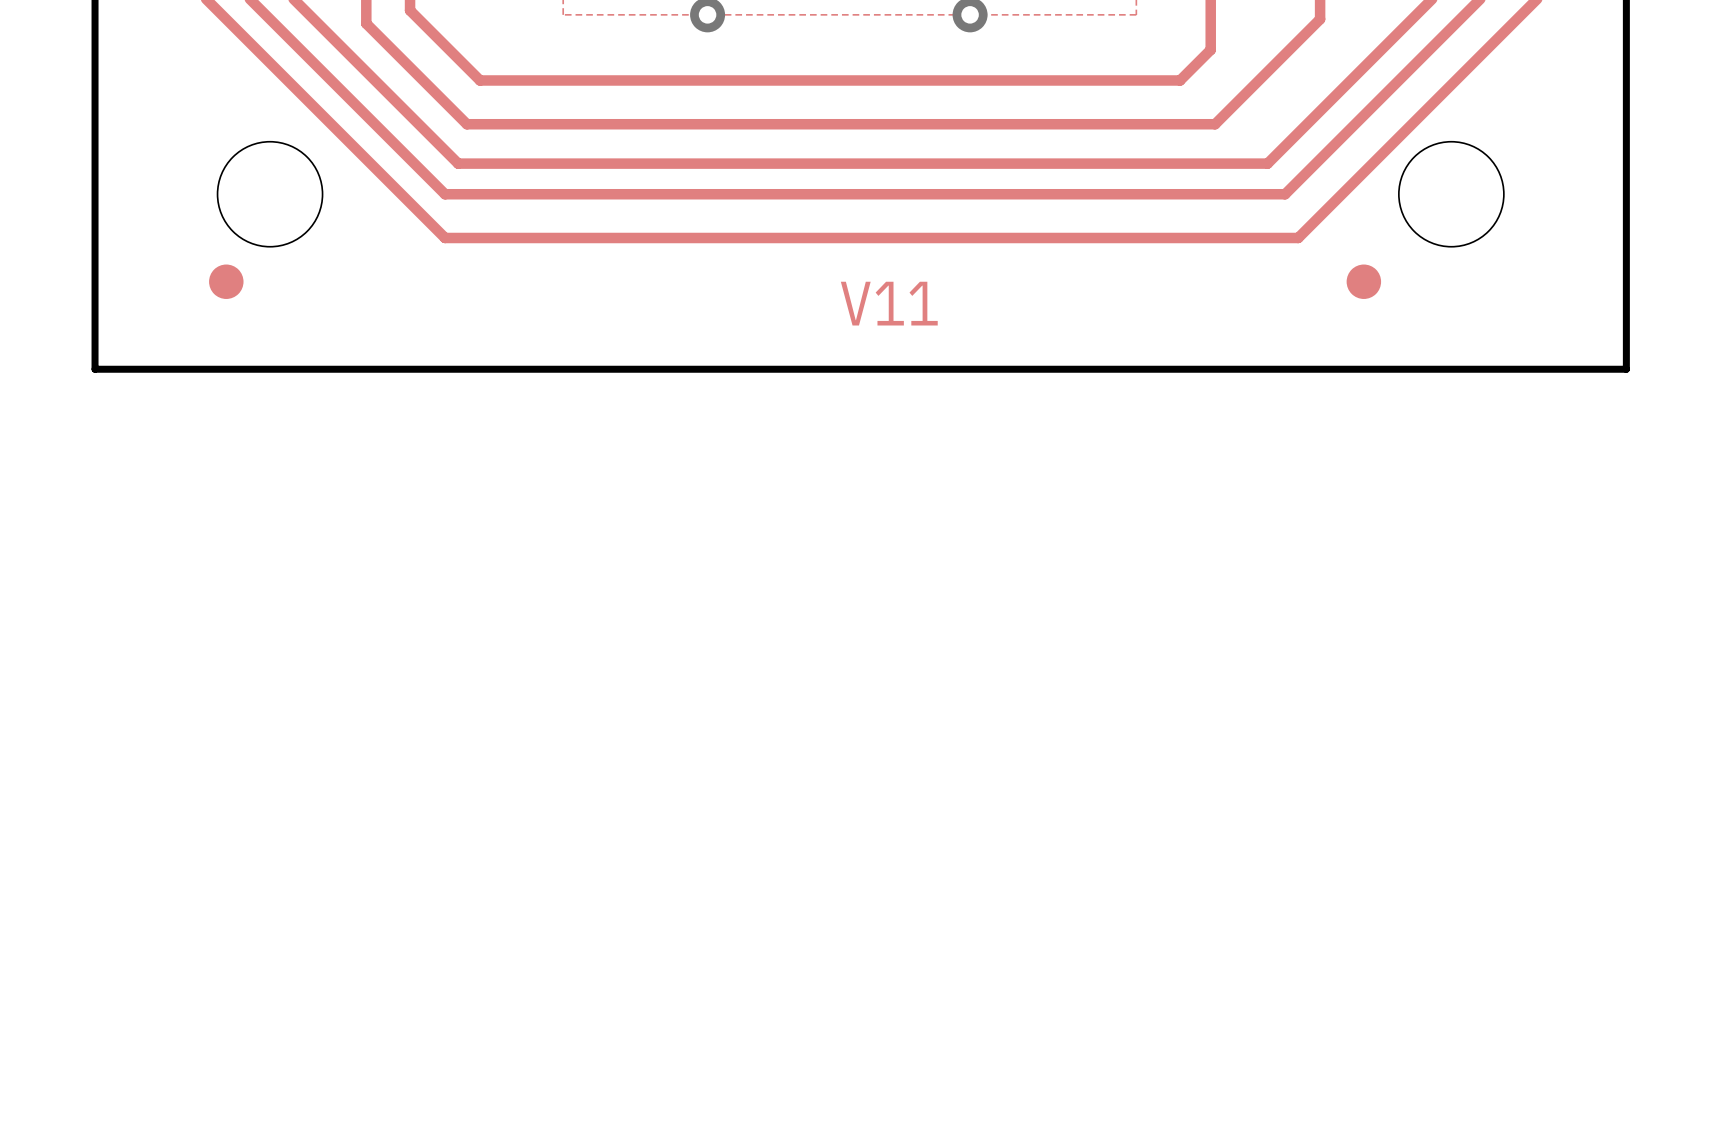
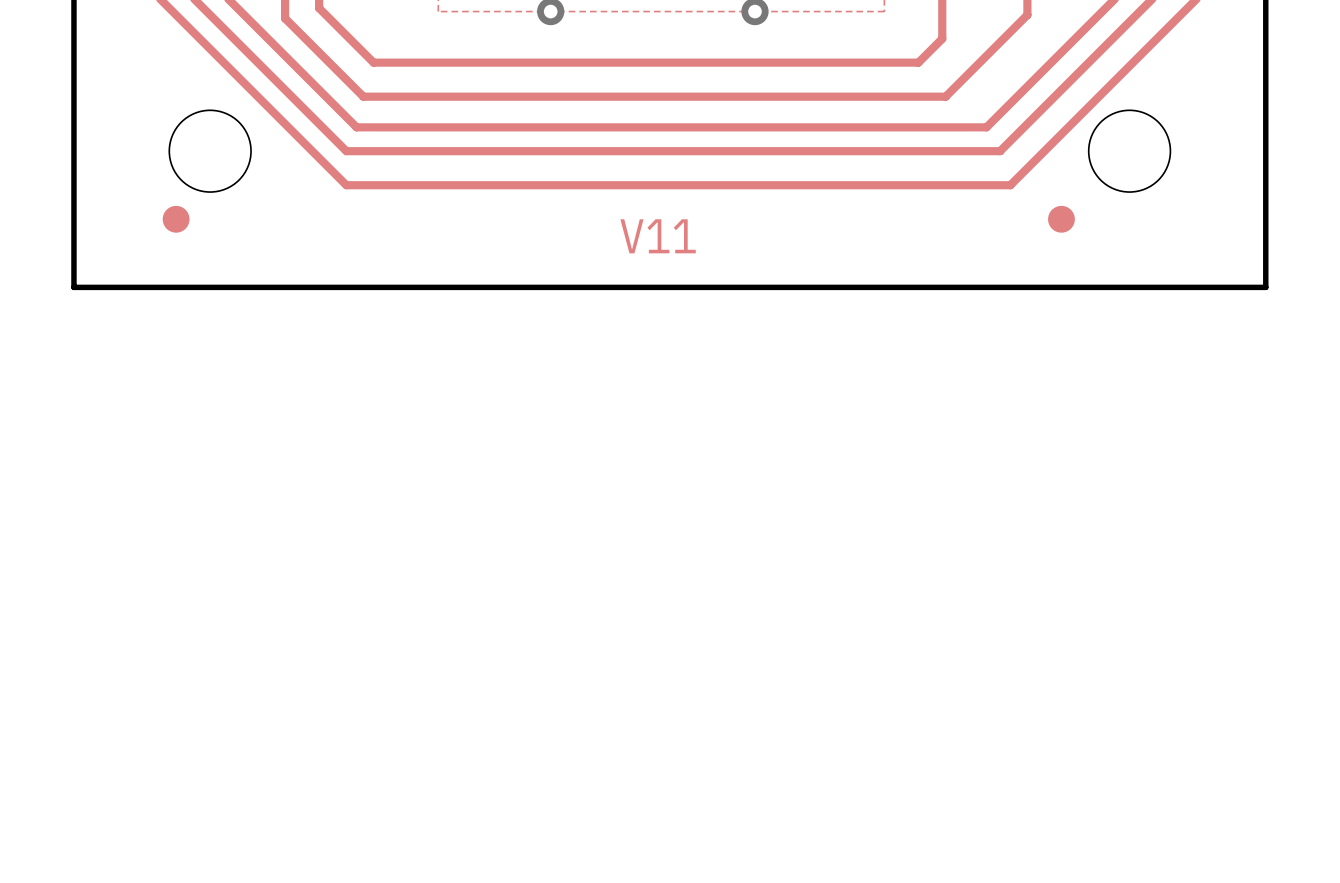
text position: V11 (889, 303) -> V11 (658, 236)

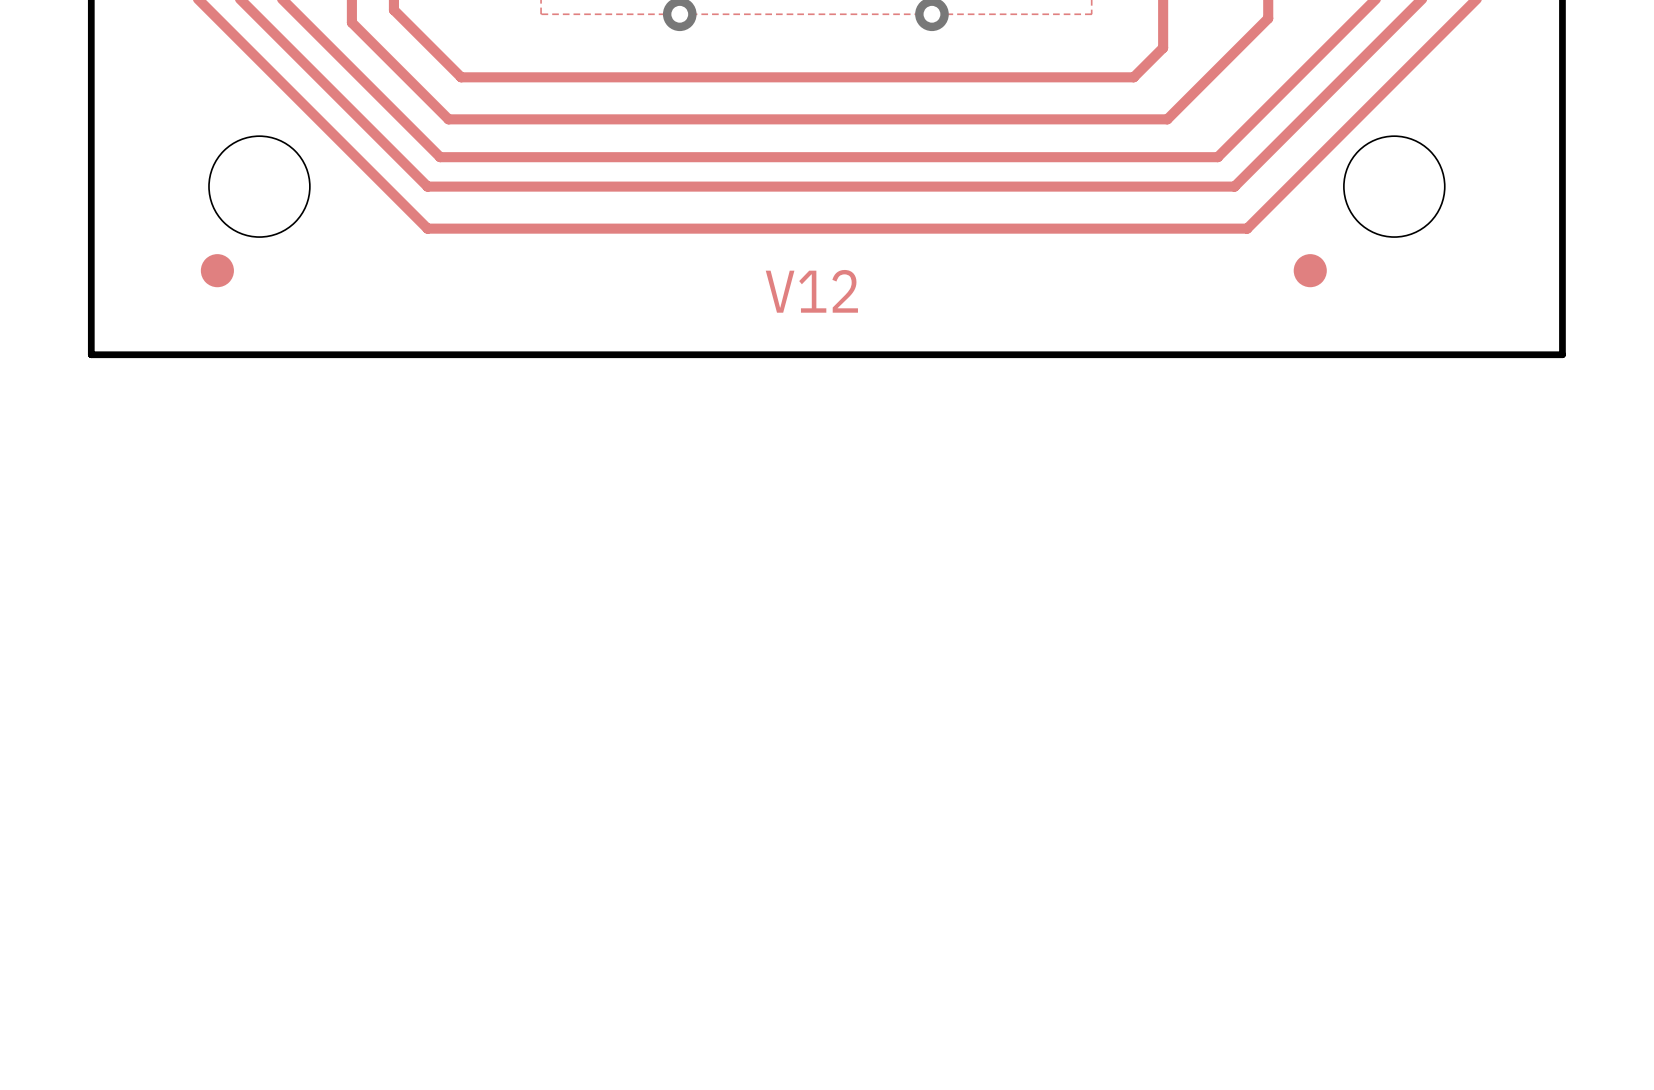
text: V11 (658, 236) -> V12 (811, 291)

